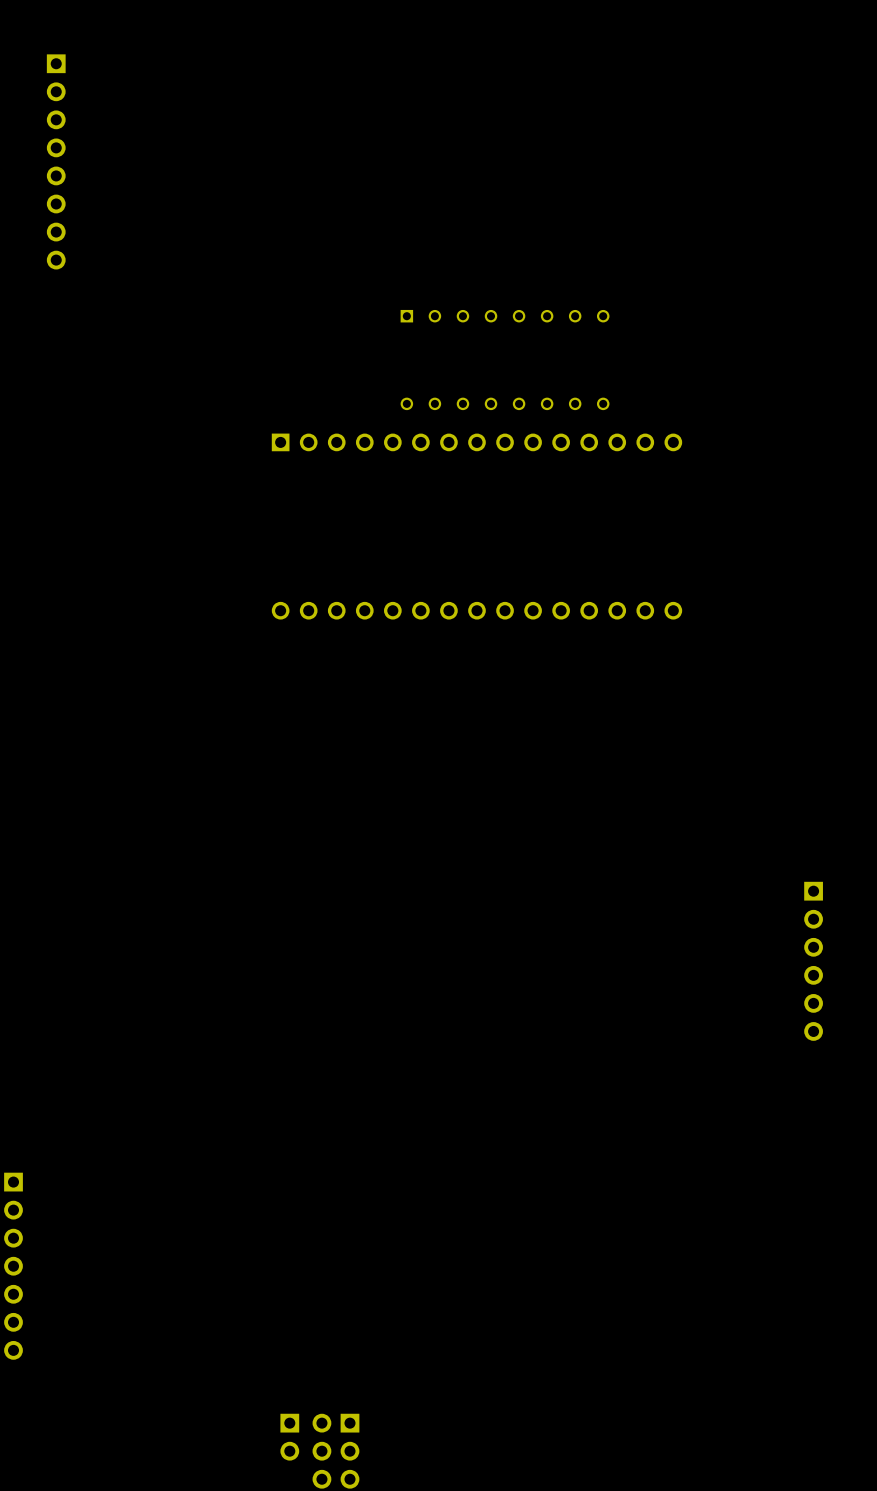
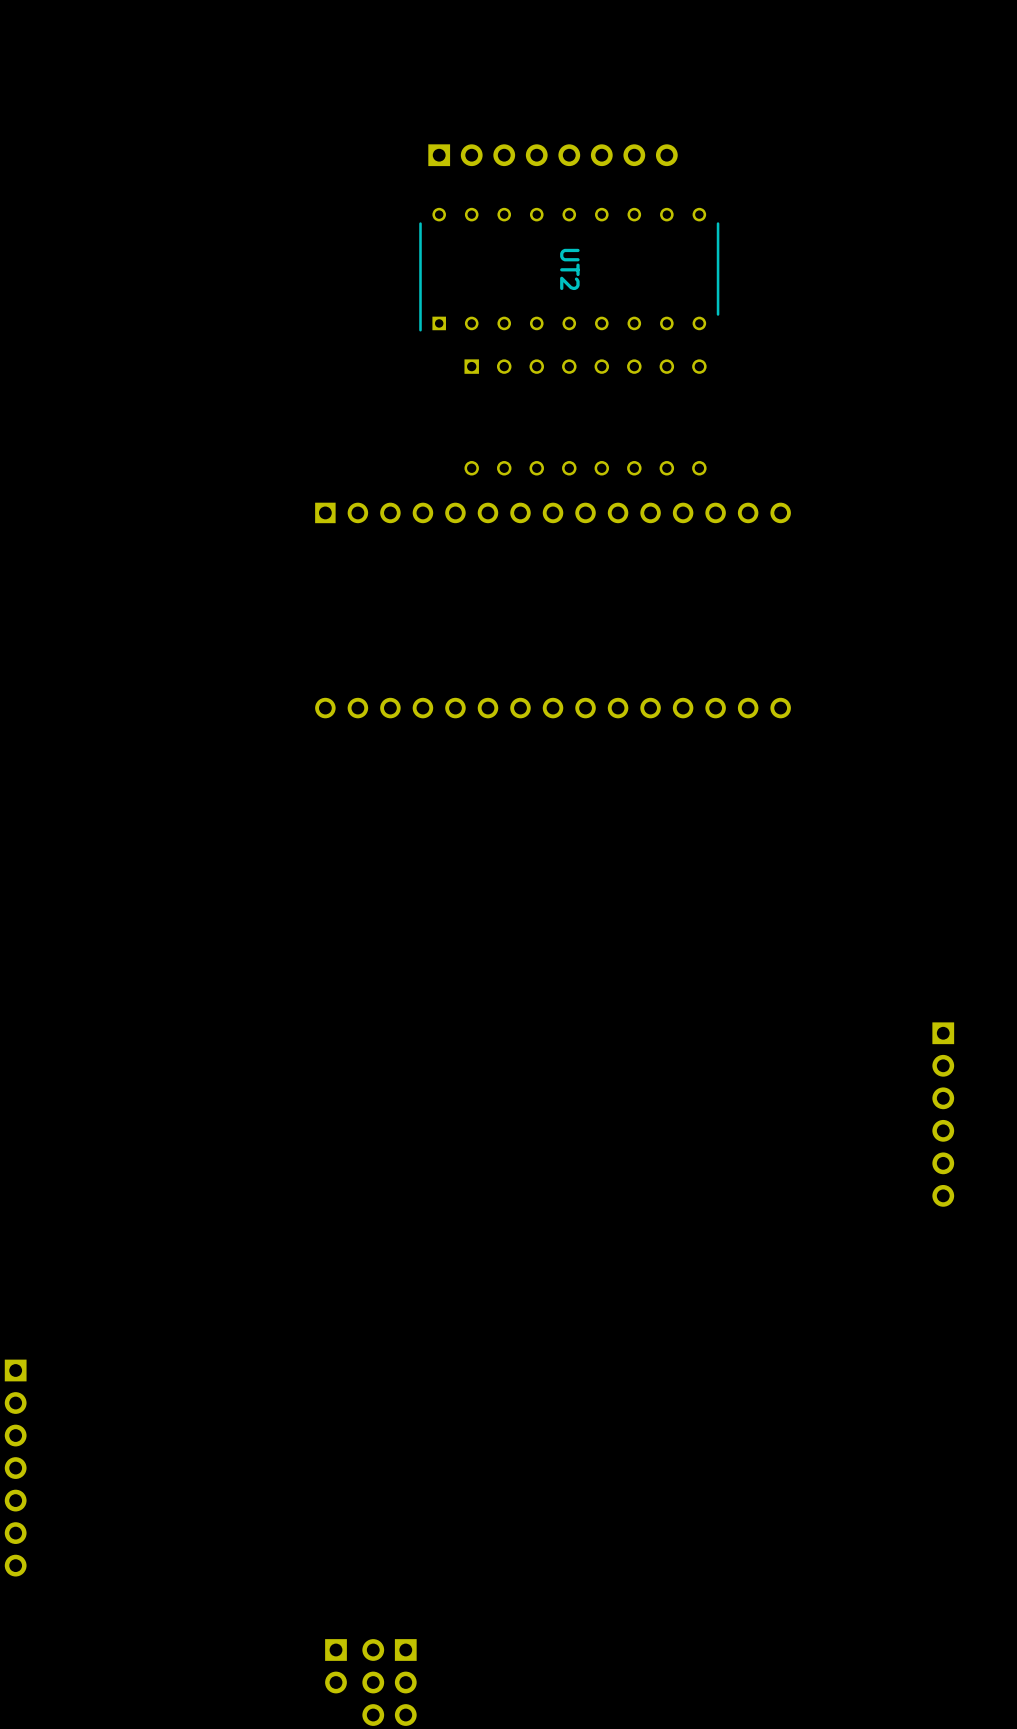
part: none -> (553, 155)
part: (56, 161) -> none
UT2: none -> (569, 269)

